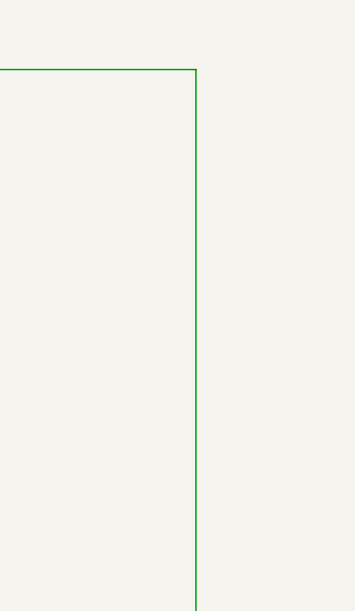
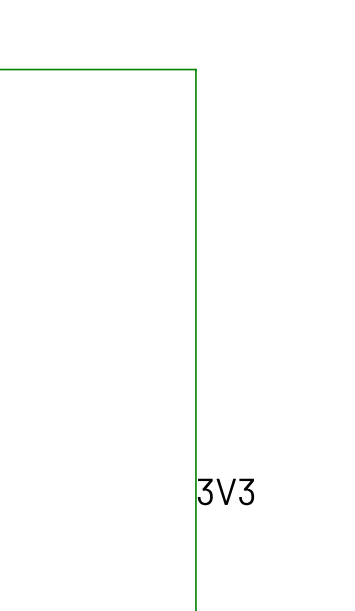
label: none -> 3V3 (225, 492)

